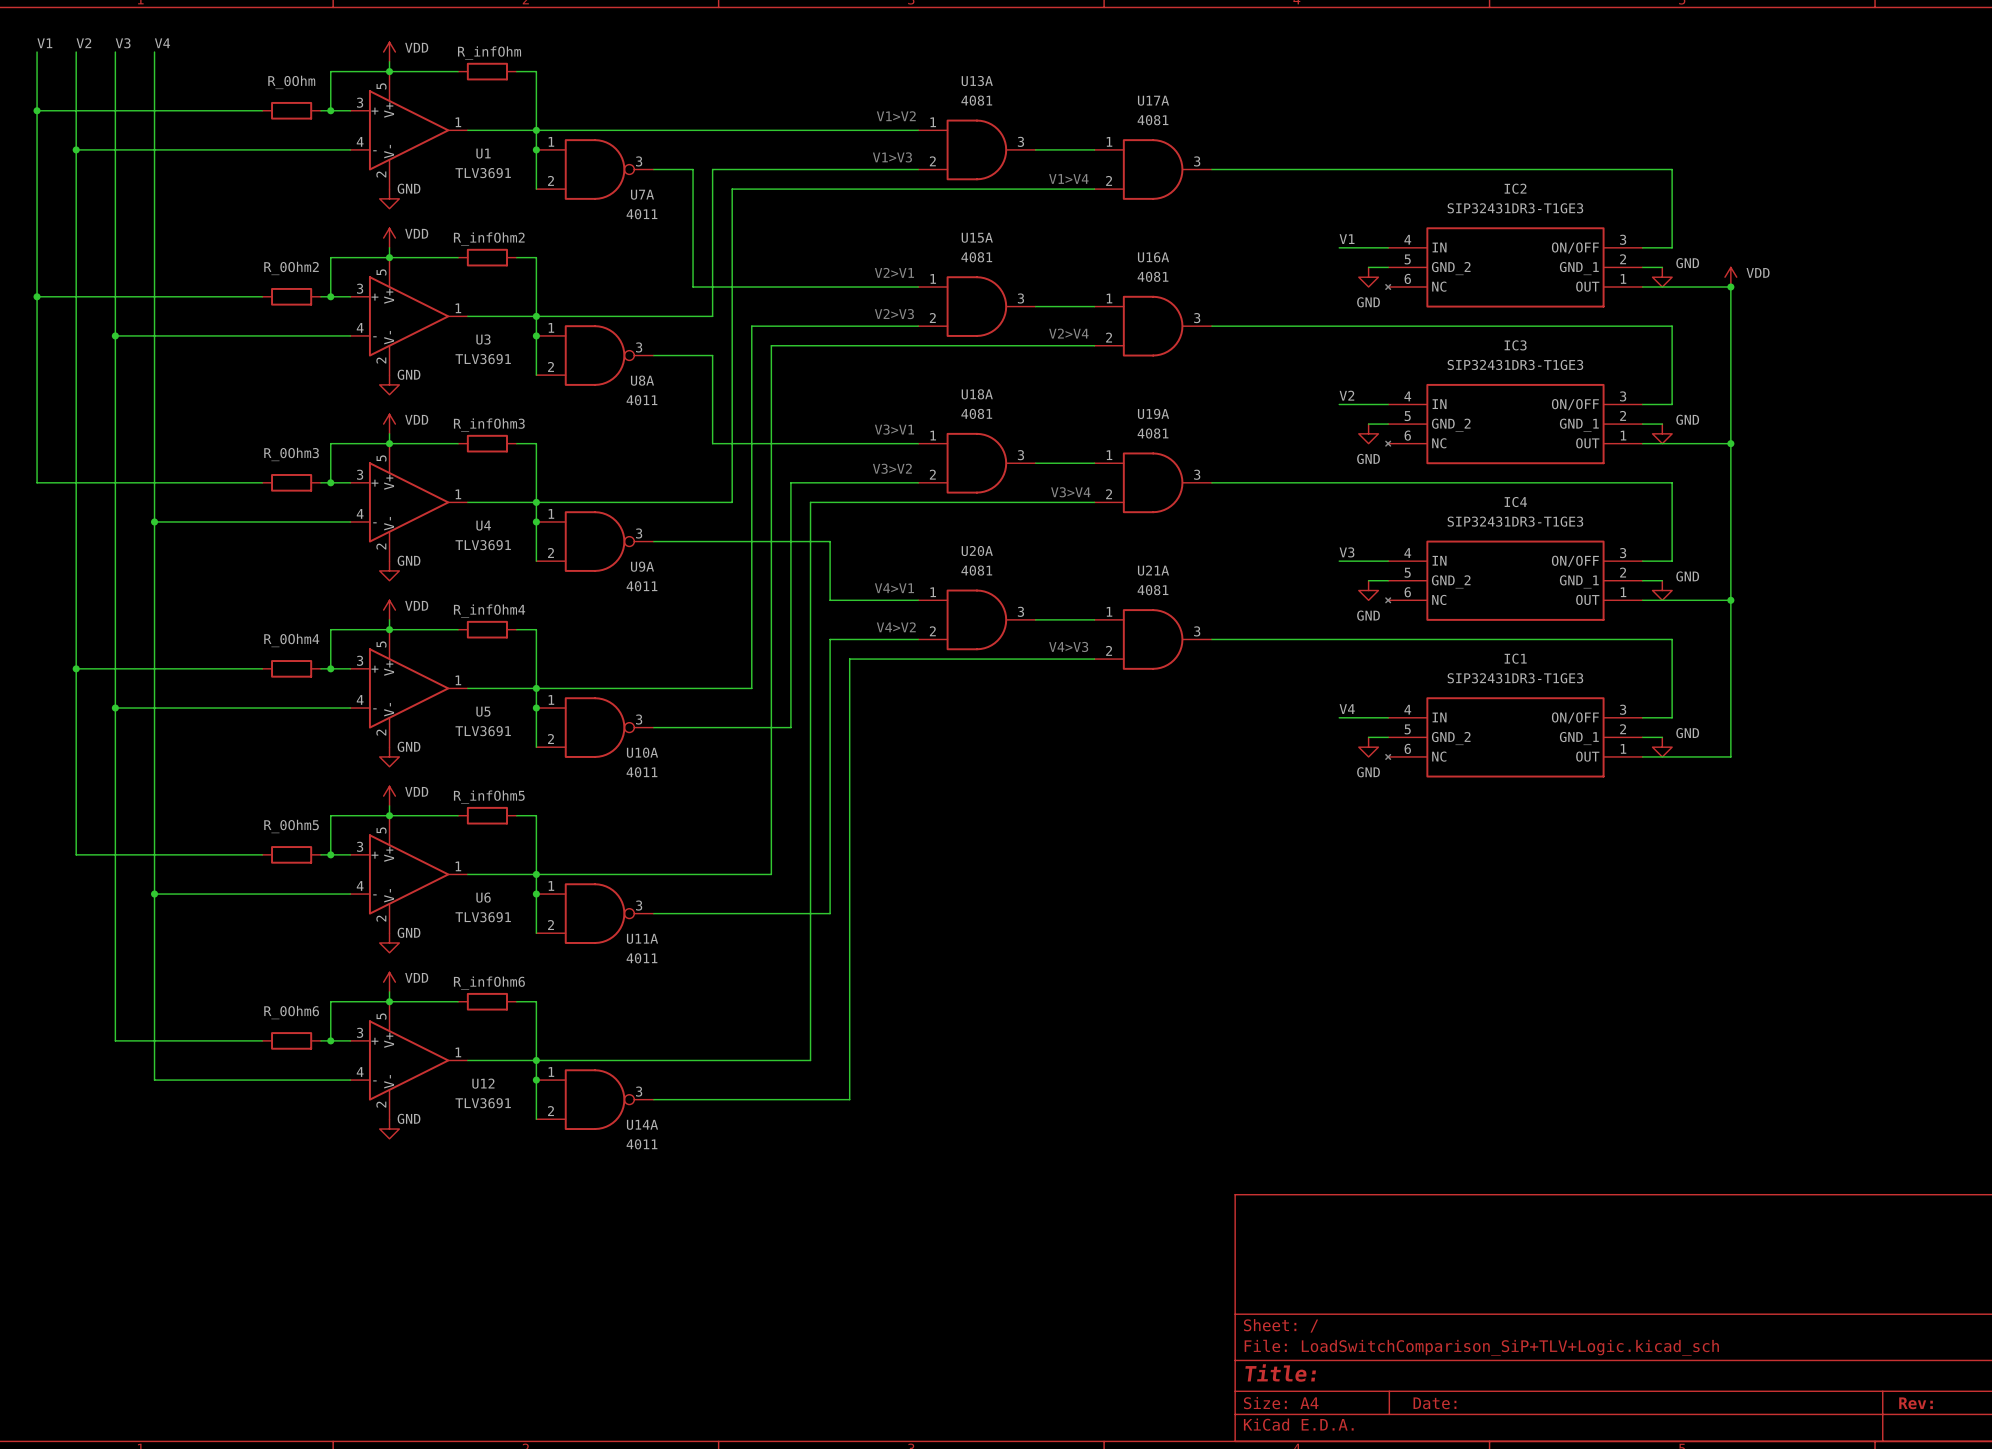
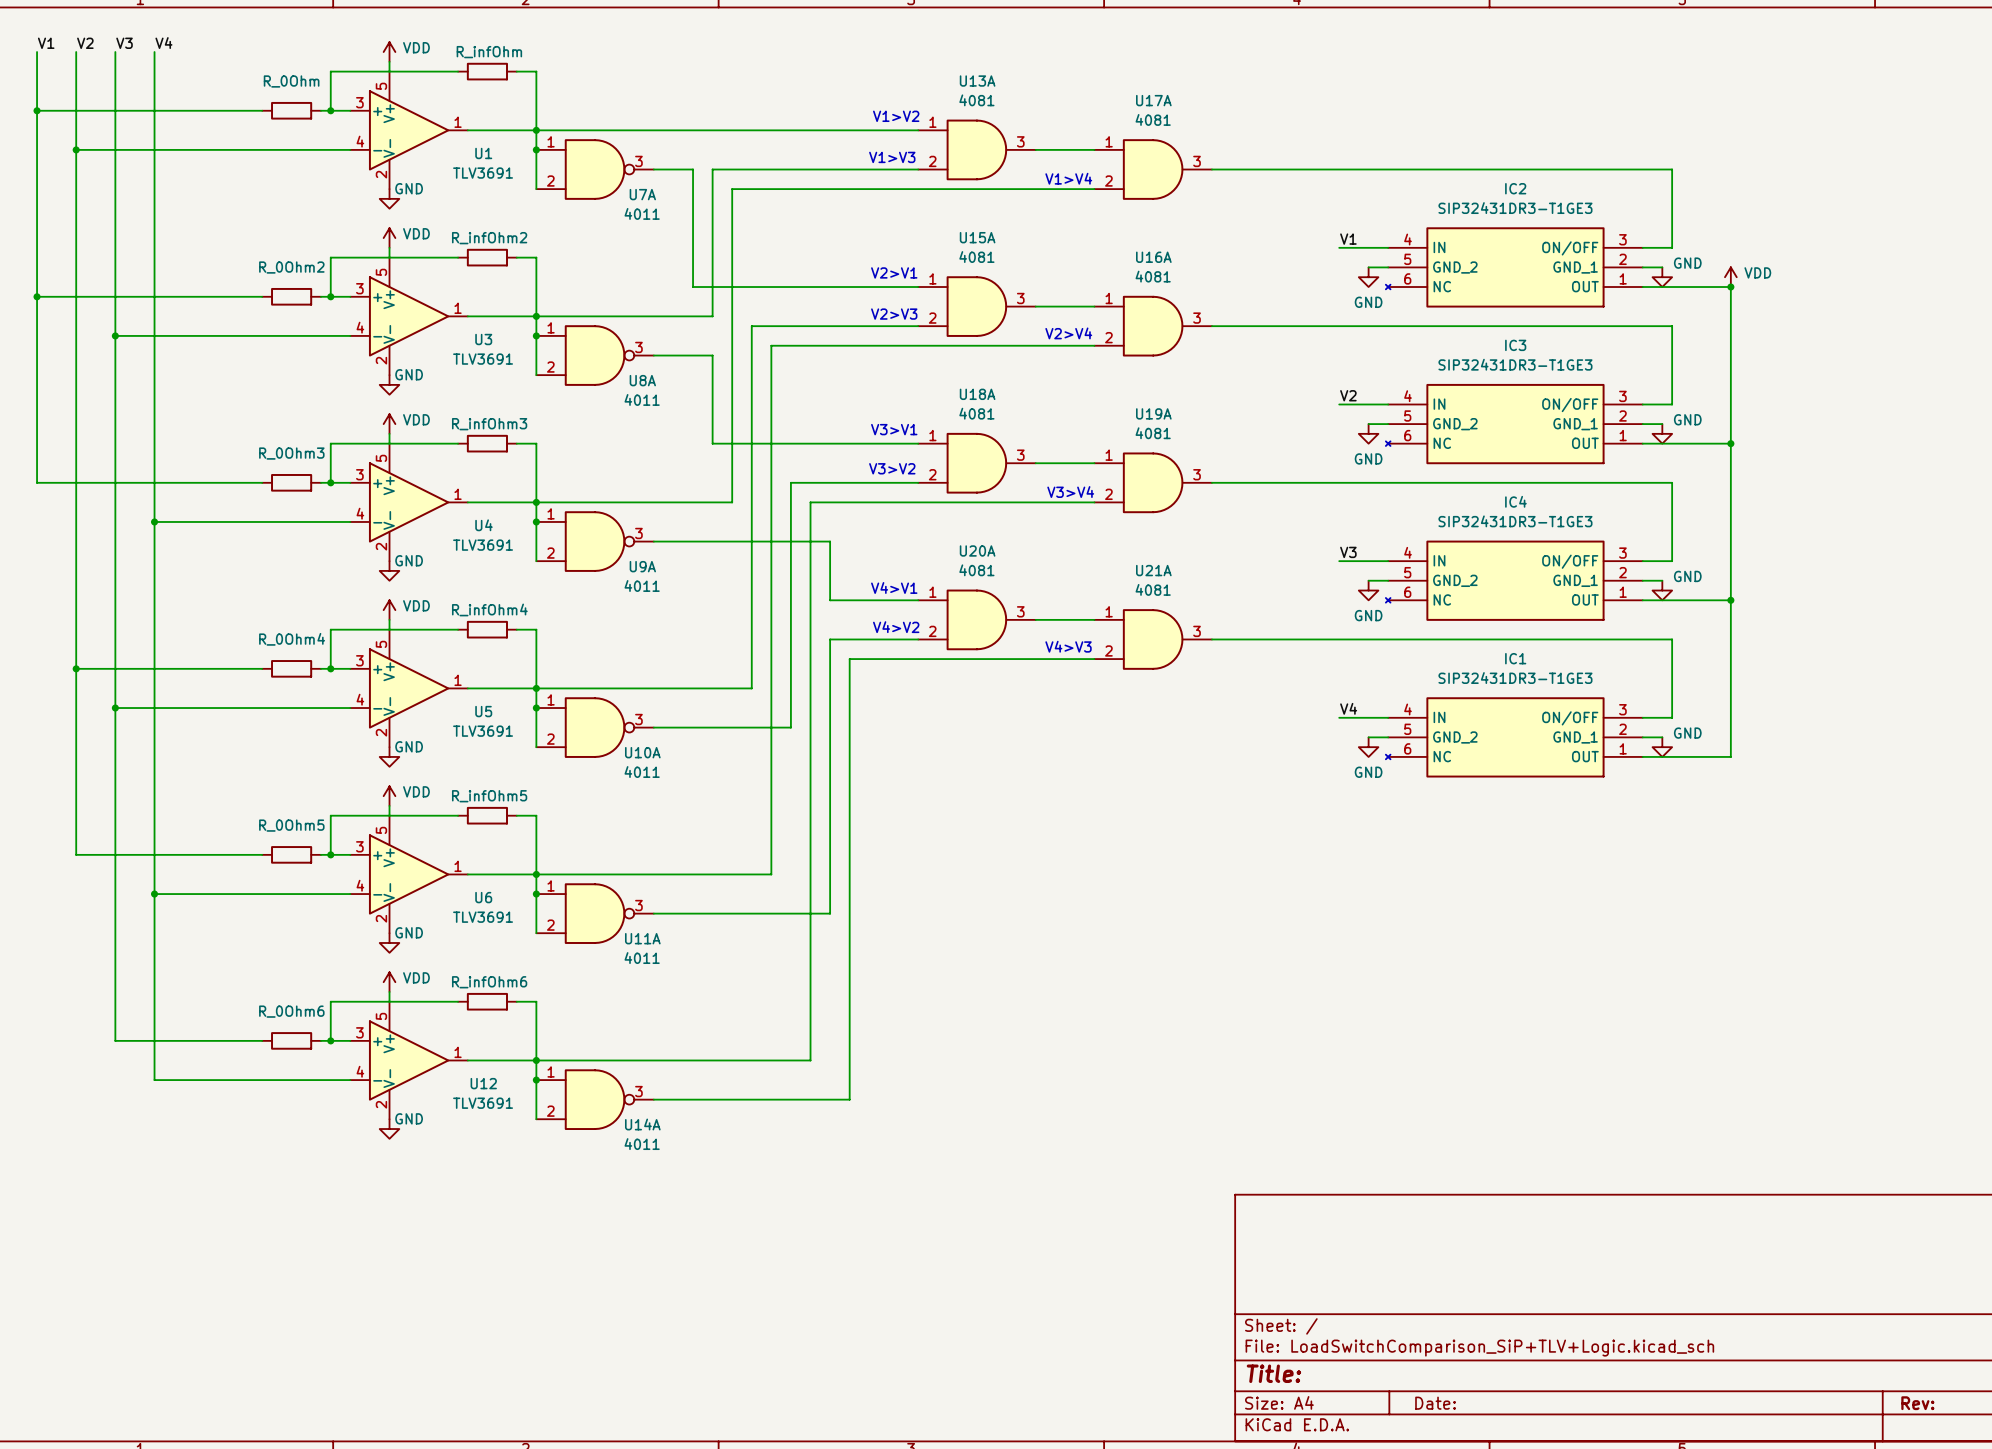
junction: (389, 71) -> none
junction: (389, 257) -> none
junction: (389, 443) -> none
junction: (389, 629) -> none
junction: (389, 815) -> none
junction: (389, 1001) -> none

